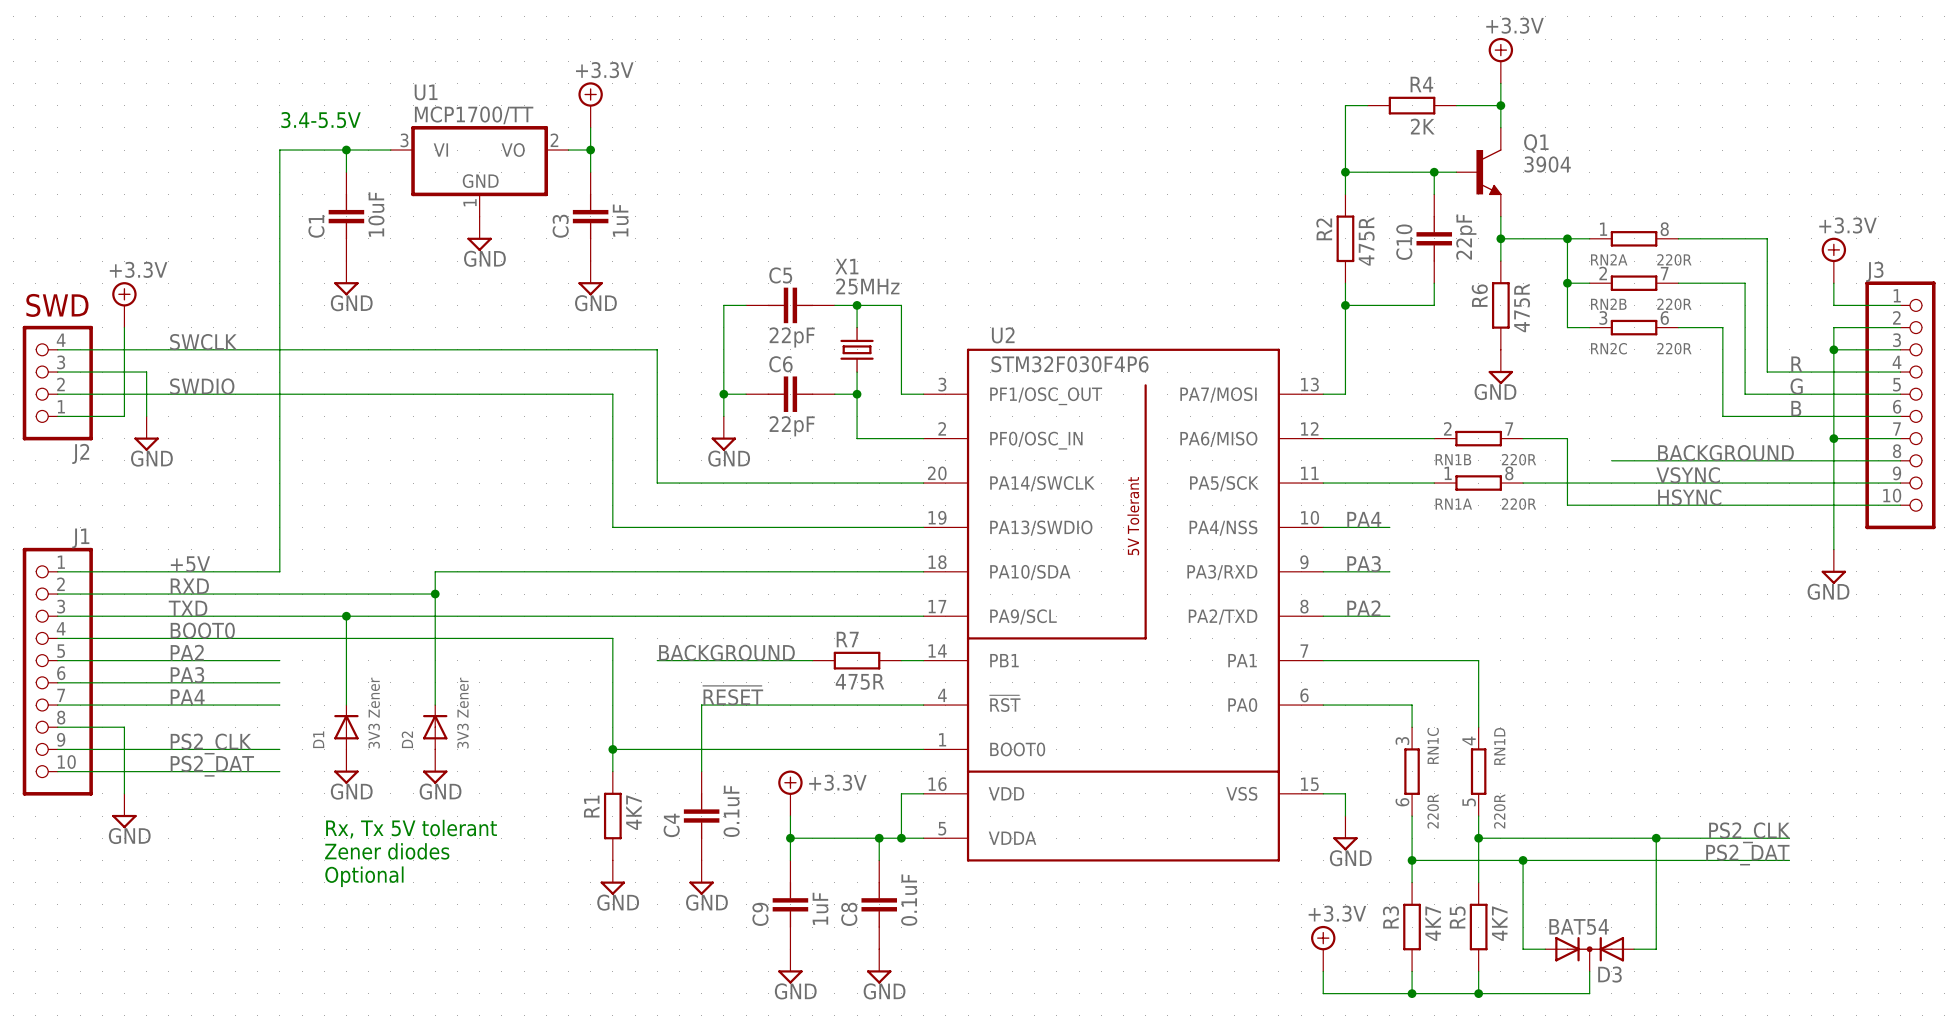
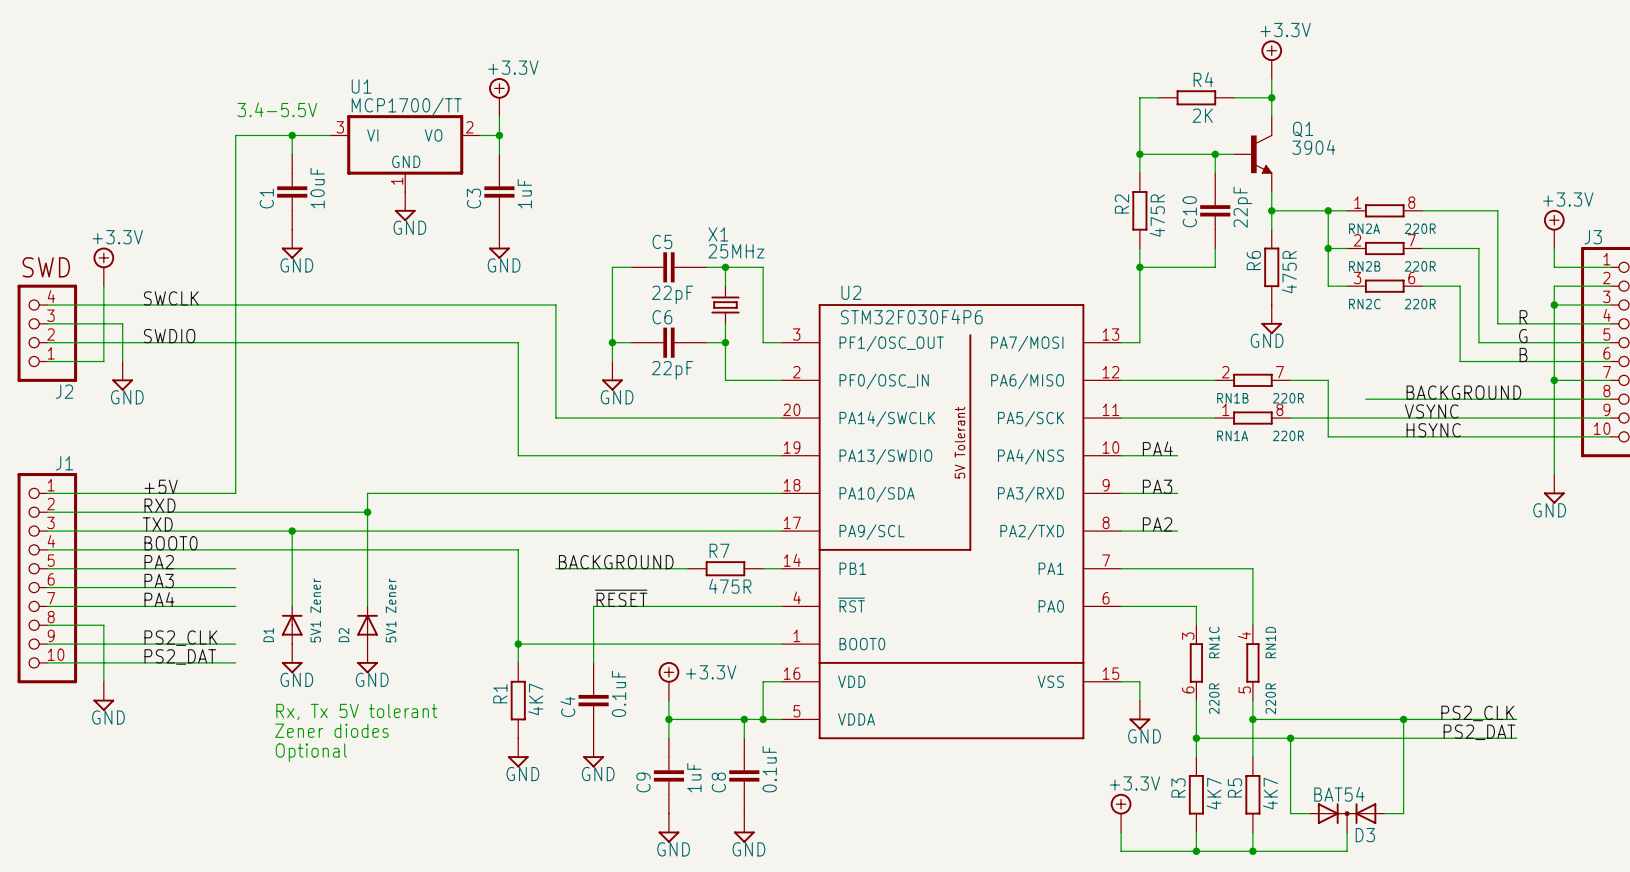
D1 value: 3V3 Zener (374, 713) -> 5V1 Zener (315, 610)
D2 value: 3V3 Zener (462, 713) -> 5V1 Zener (391, 610)

